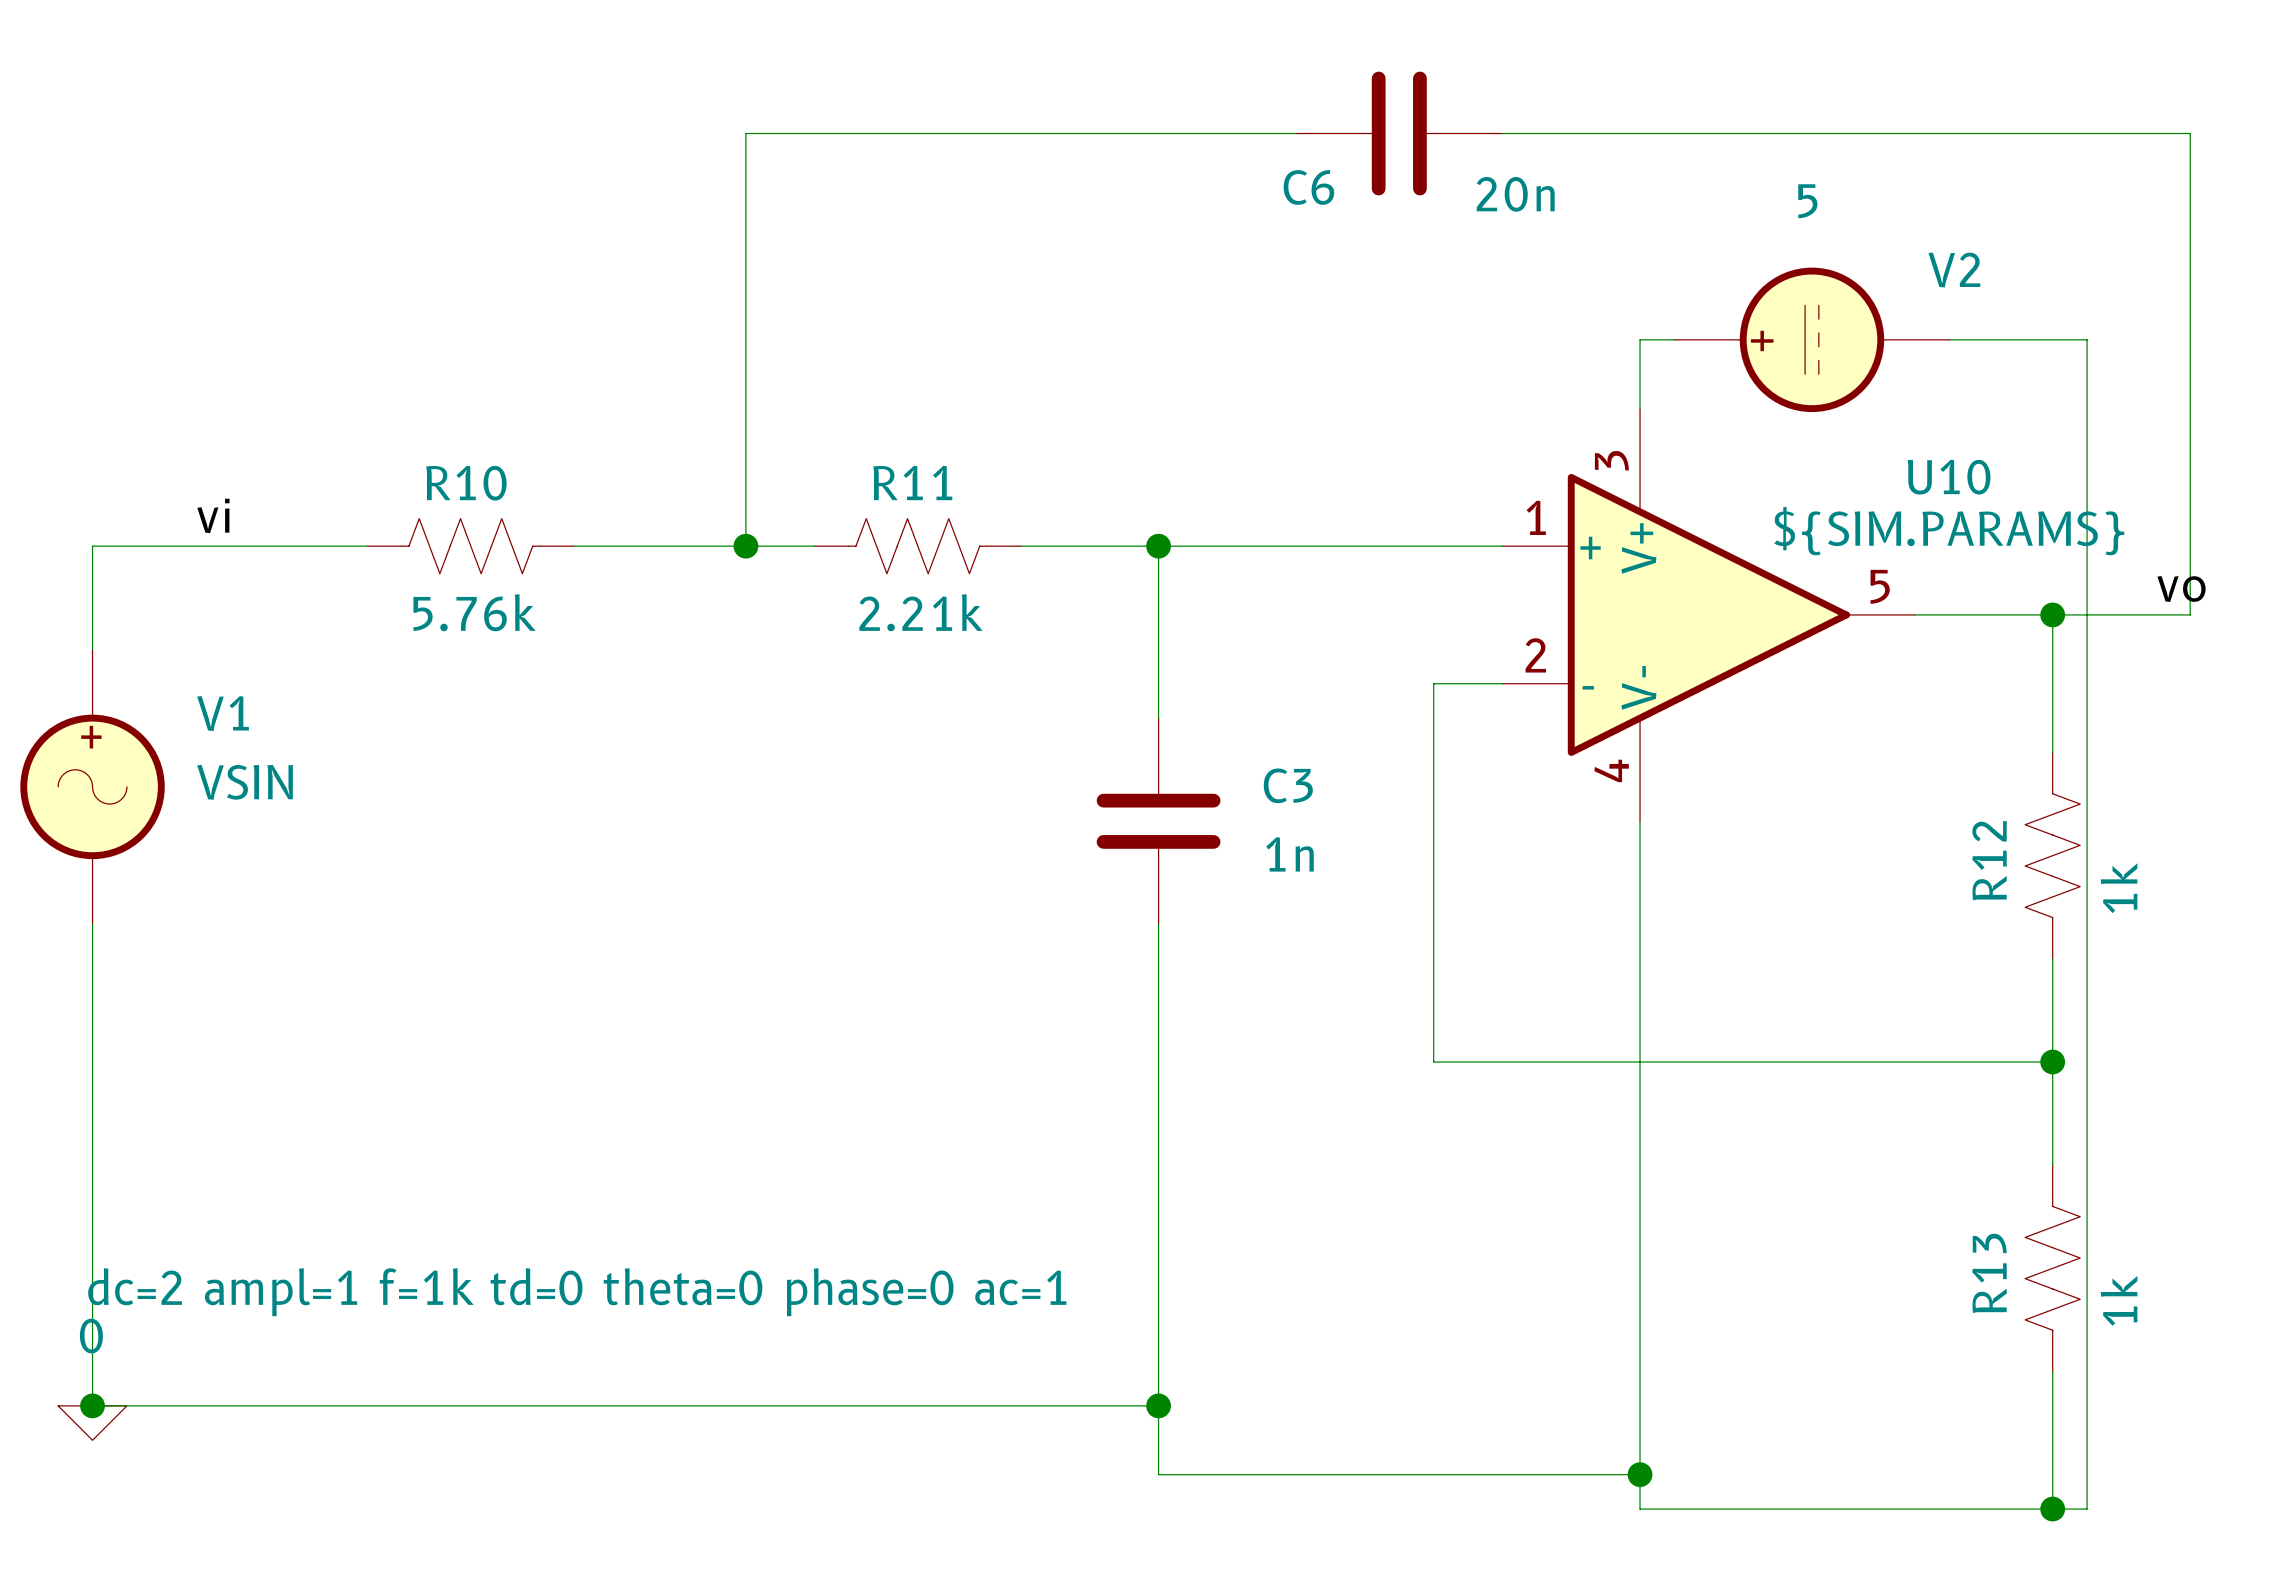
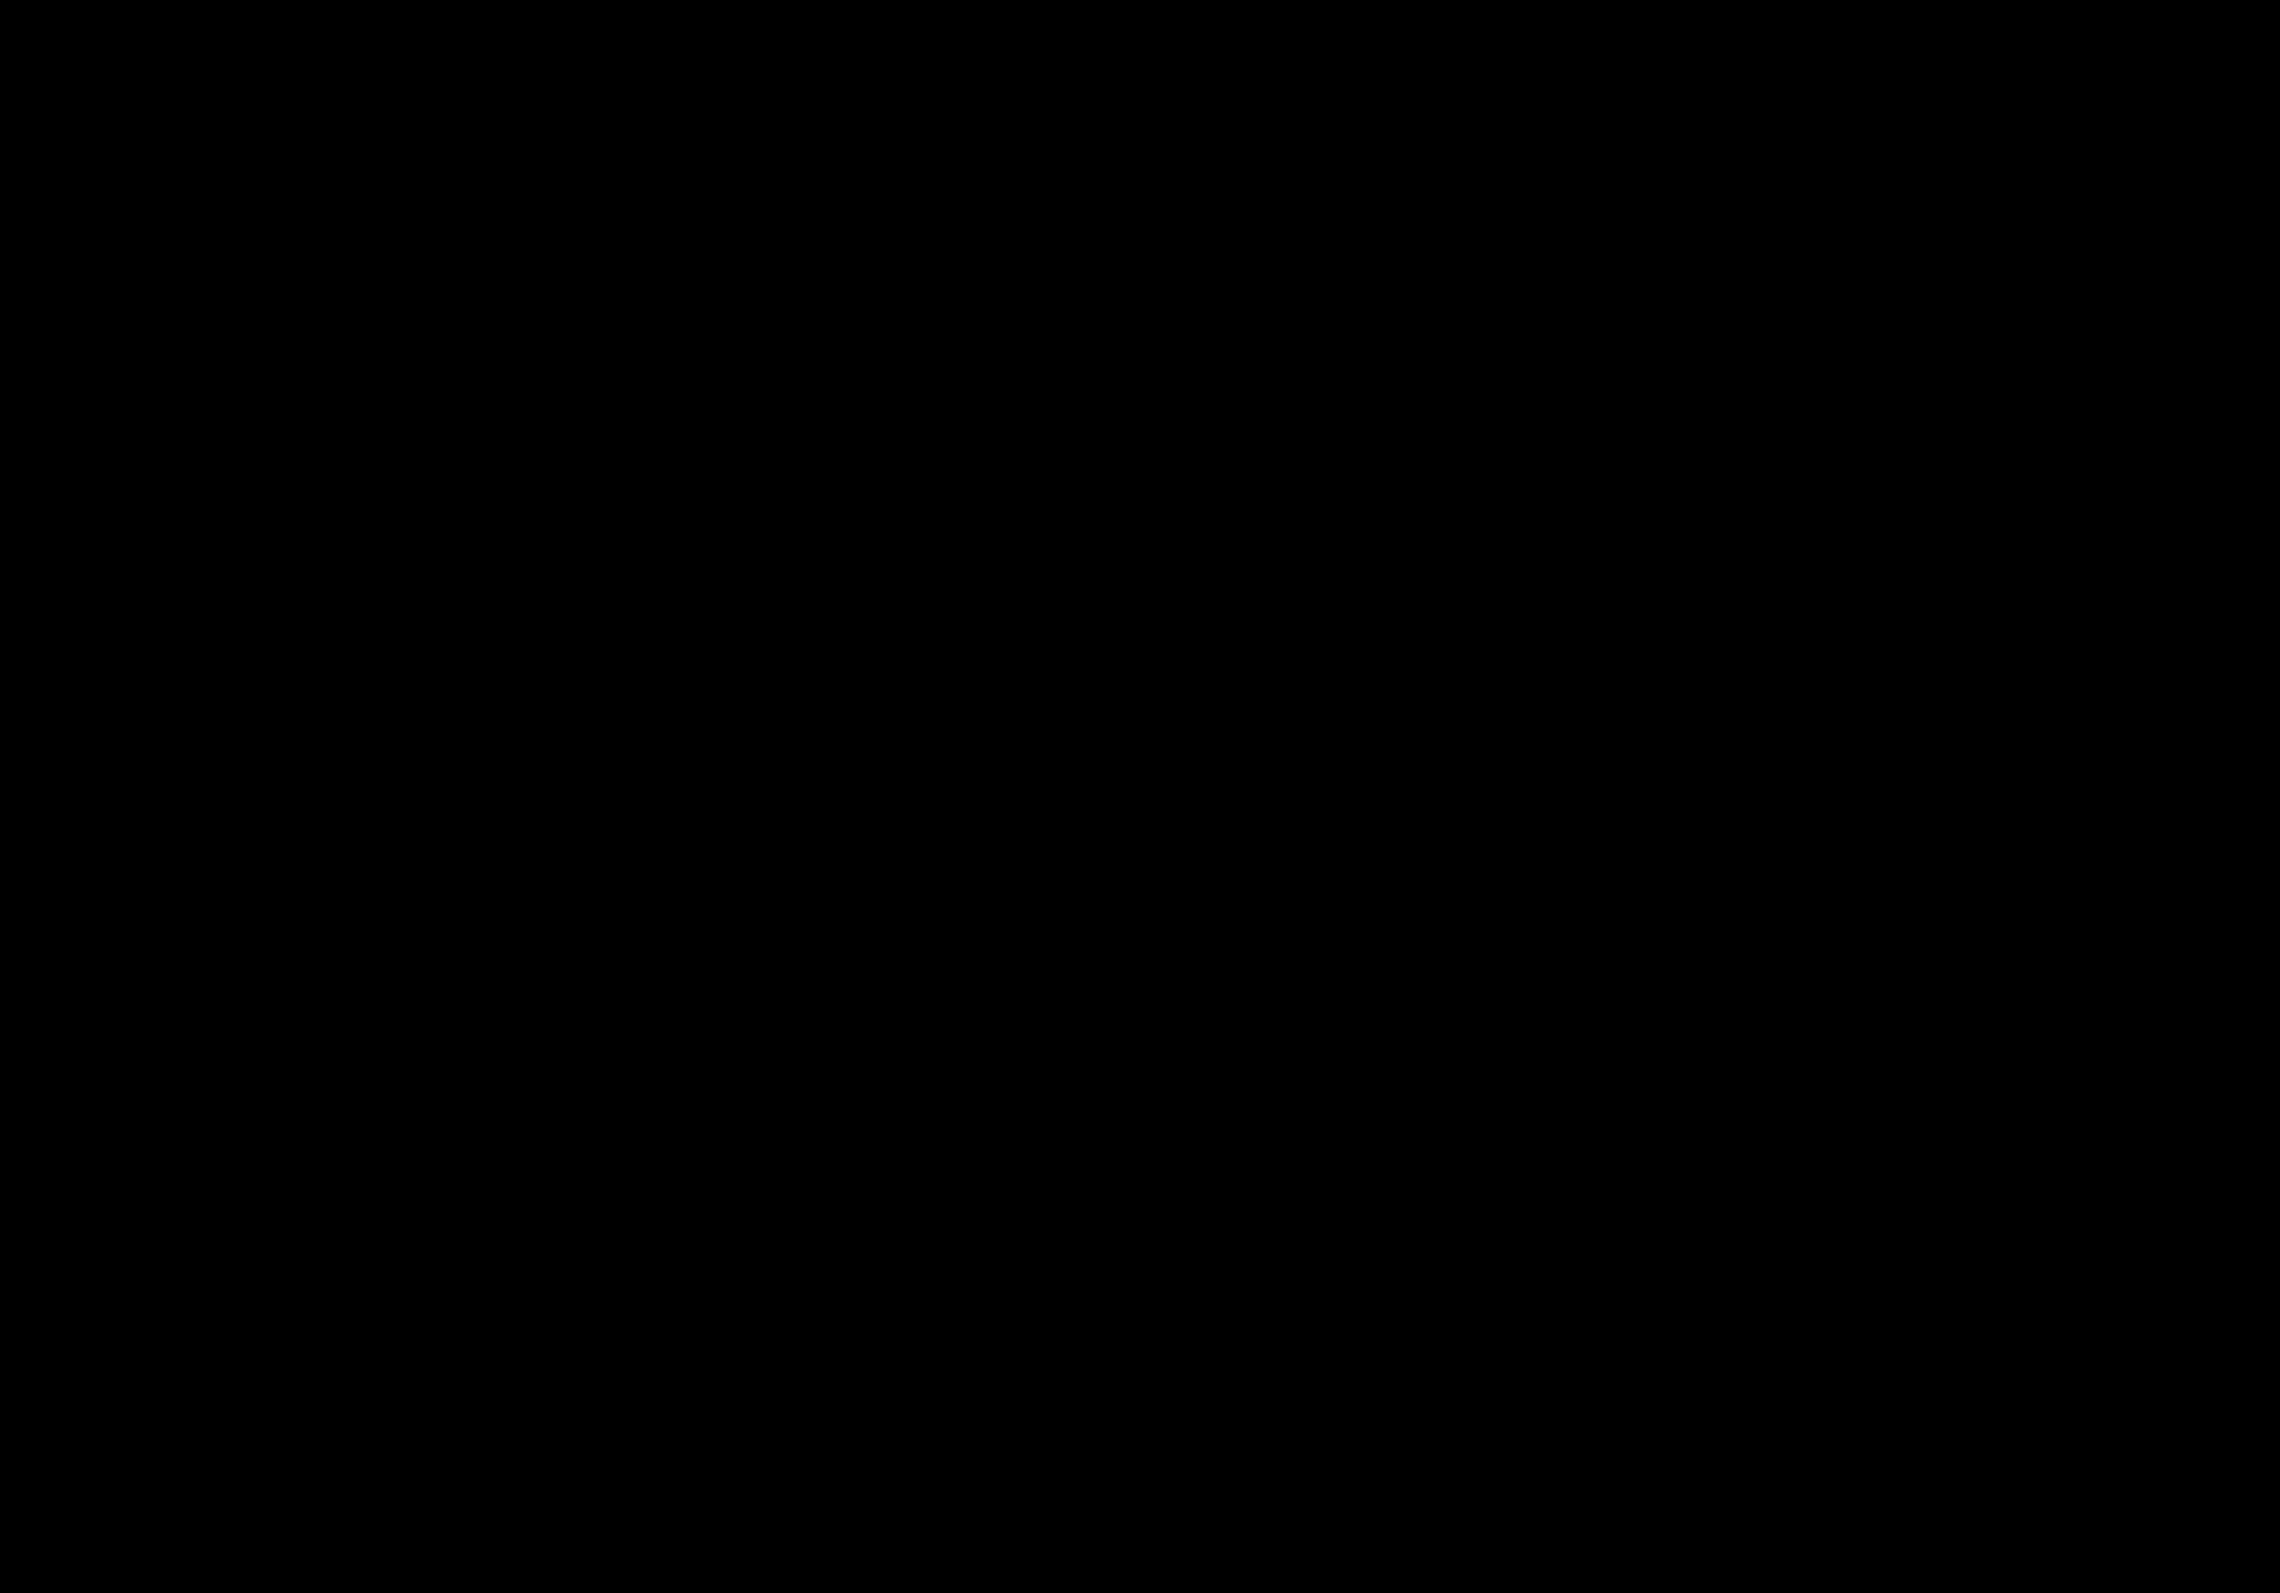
wire: (1296, 133) (745, 133) (745, 546) -> none
C6: 20n (1399, 133) -> none
wire: (1502, 133) (2190, 133) (2190, 614) (1915, 614) -> none
wire: (1674, 339) (1640, 339) (1640, 408) -> none
V2: 5 (1811, 339) -> none
wire: (1949, 339) (2087, 339) (2087, 1509) (1640, 1509) (1640, 821) -> none
label: vi (213, 515) -> none
wire: (367, 546) (92, 546) (92, 649) -> none
R10: 5.76k (470, 546) -> none
wire: (573, 546) (814, 546) -> none
junction: (745, 546) -> none
R11: 2.21k (917, 546) -> none
wire: (1021, 546) (1502, 546) -> none
wire: (1158, 546) (1158, 718) -> none
junction: (1158, 546) -> none
label: vo (2181, 589) -> none
U10: ${SIM.PARAMS} (1708, 614) -> none
wire: (2052, 614) (2052, 752) -> none
junction: (2052, 614) -> none
wire: (1502, 683) (1433, 683) (1433, 1062) (2052, 1062) -> none
V1: VSIN (92, 786) -> none
C3: 1n (1158, 821) -> none
R12: 1k (2052, 855) -> none
wire: (92, 924) (92, 1405) (1158, 1405) -> none
wire: (1158, 924) (1158, 1474) (1640, 1474) -> none
wire: (2052, 958) (2052, 1165) -> none
junction: (2052, 1062) -> none
R13: 1k (2052, 1268) -> none
wire: (2052, 1371) (2052, 1509) -> none
junction: (92, 1405) -> none
junction: (1158, 1405) -> none
power symbol: 0 (92, 1423) -> none
junction: (1640, 1474) -> none
junction: (2052, 1509) -> none

